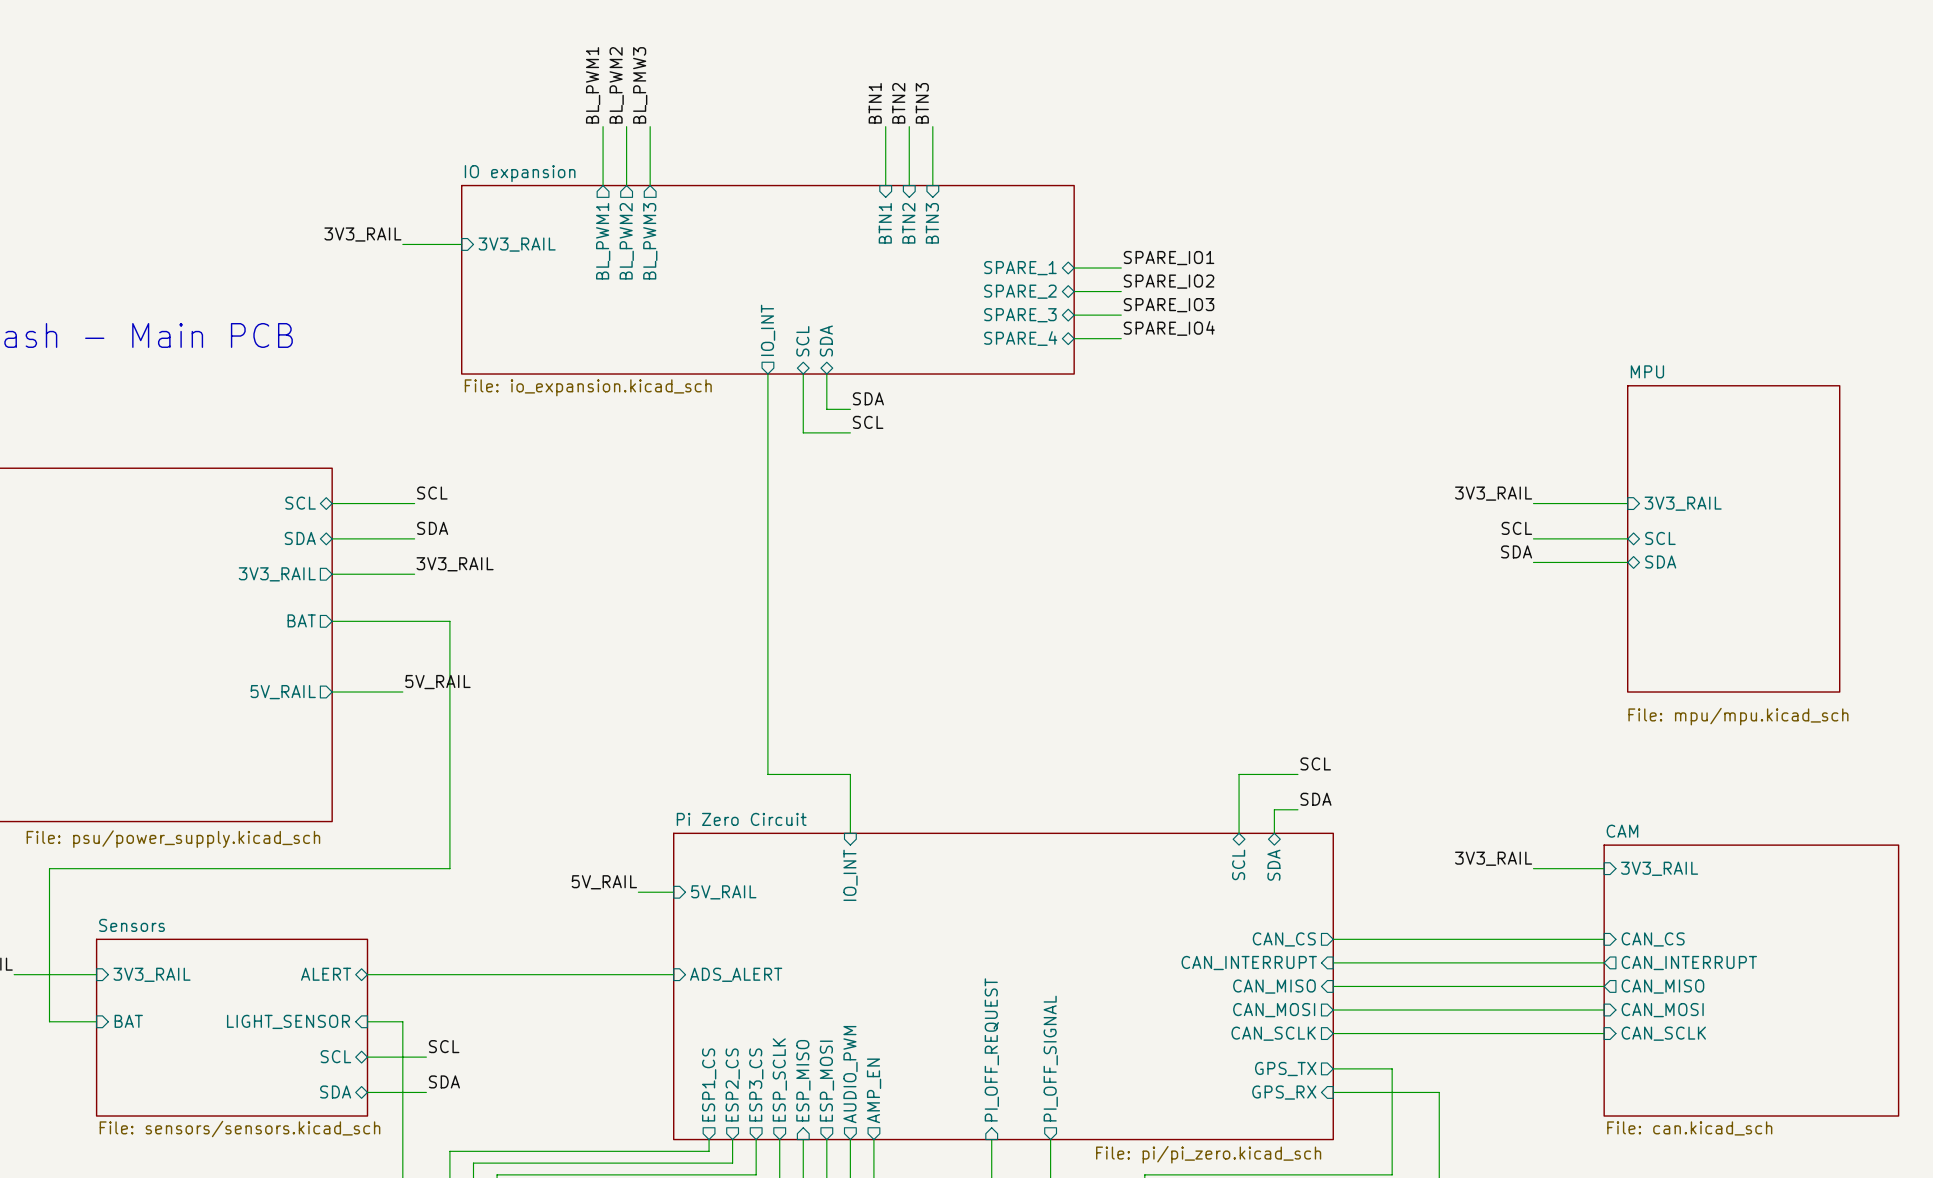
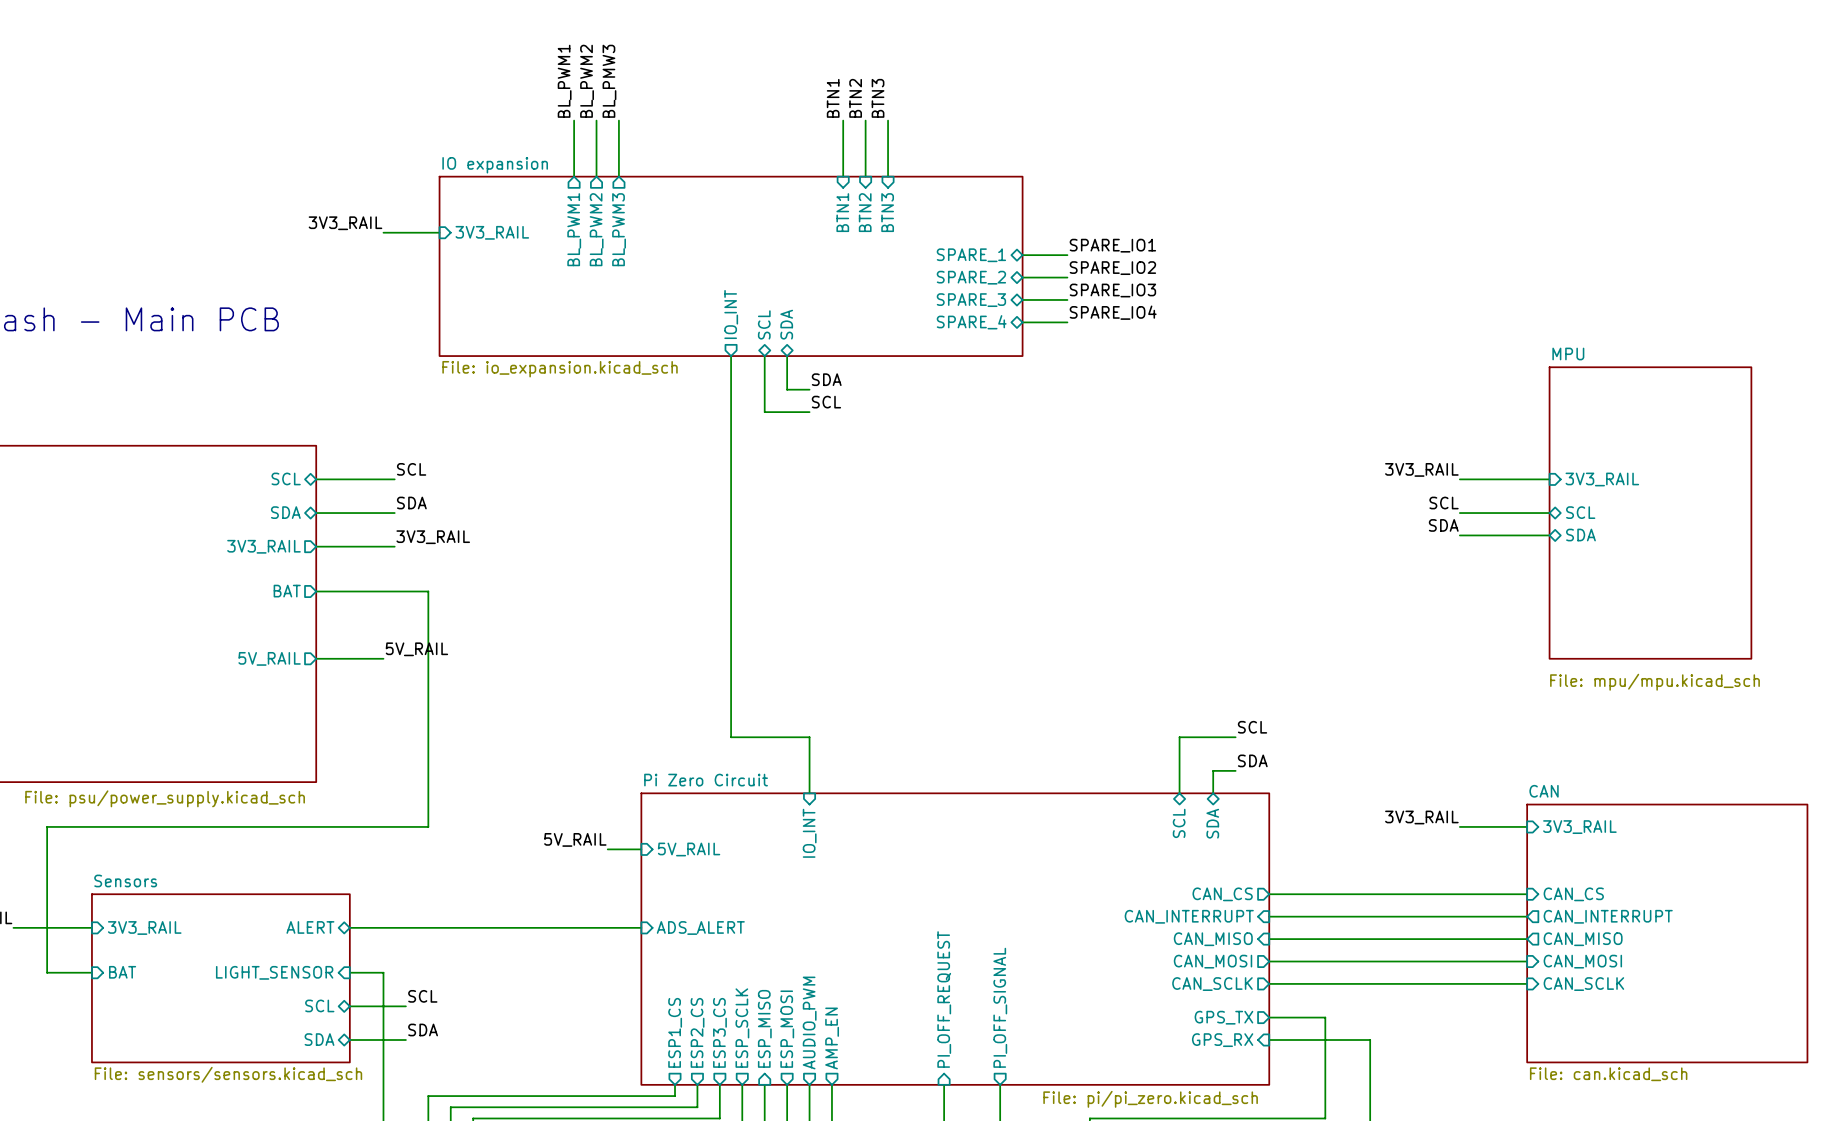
sheet CAM name: CAM (1622, 831) -> CAN (1544, 791)

